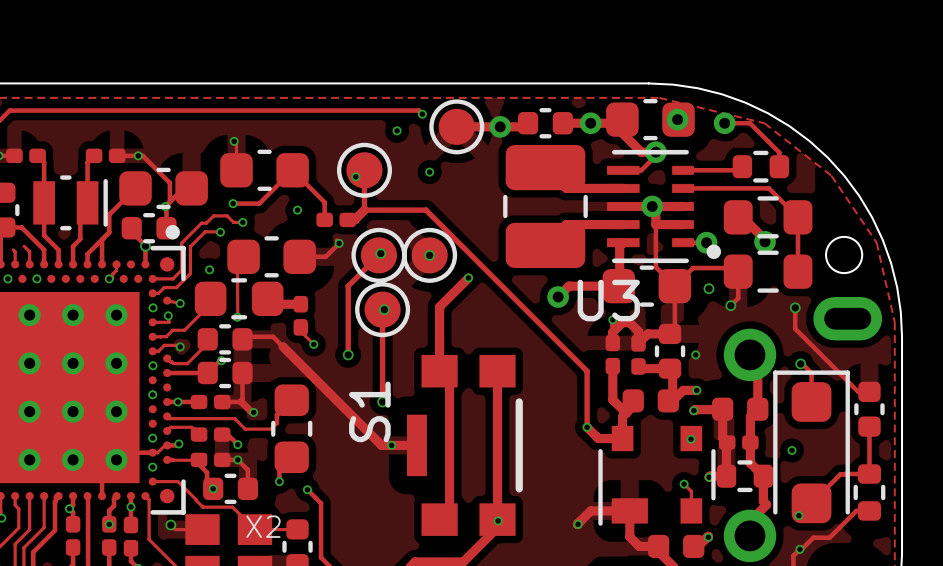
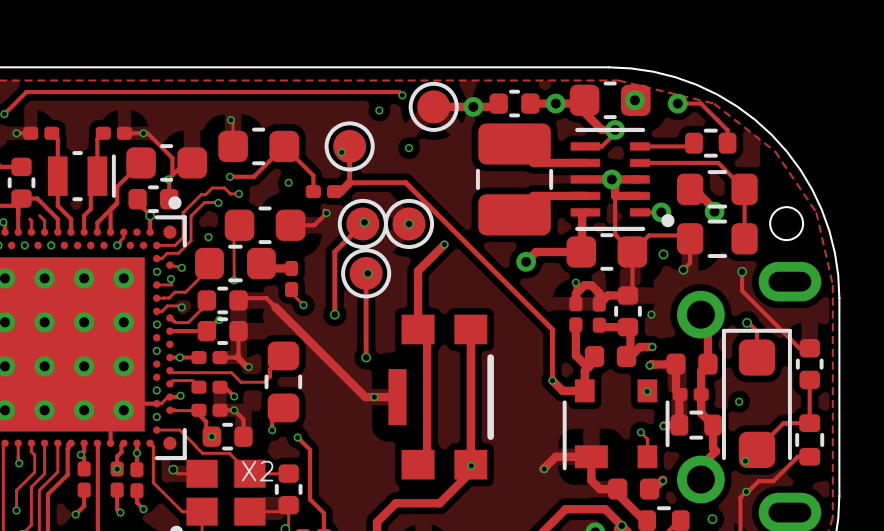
U3 name: U3 (608, 300) -> none
S1 name: S1 (369, 411) -> none

